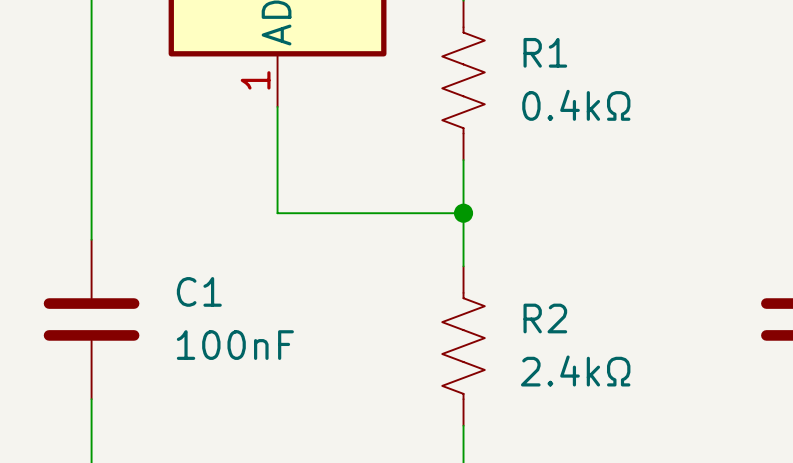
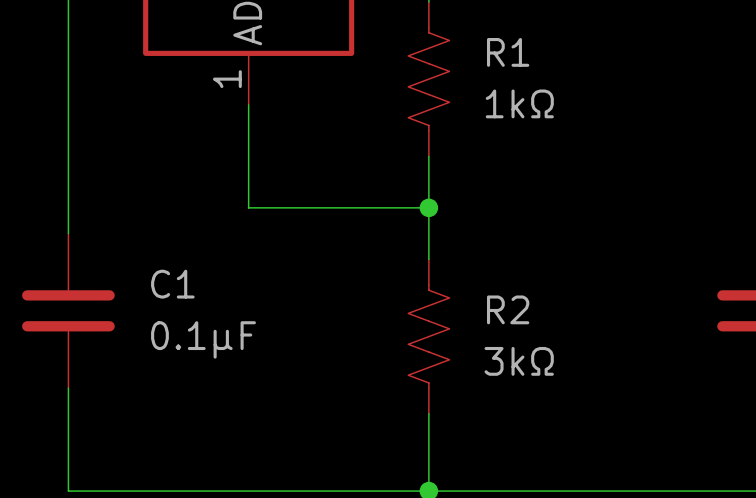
R1 value: 0.4kΩ (576, 105) -> 1kΩ (519, 103)
C1 value: 100nF (235, 345) -> 0.1μF (203, 339)
R2 value: 2.4kΩ (575, 370) -> 3kΩ (519, 361)

